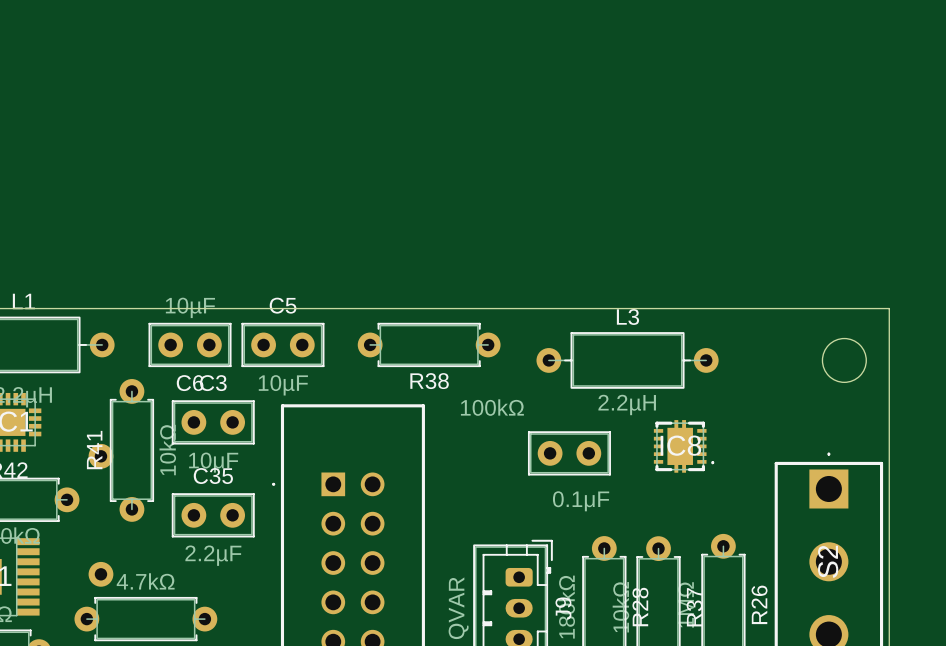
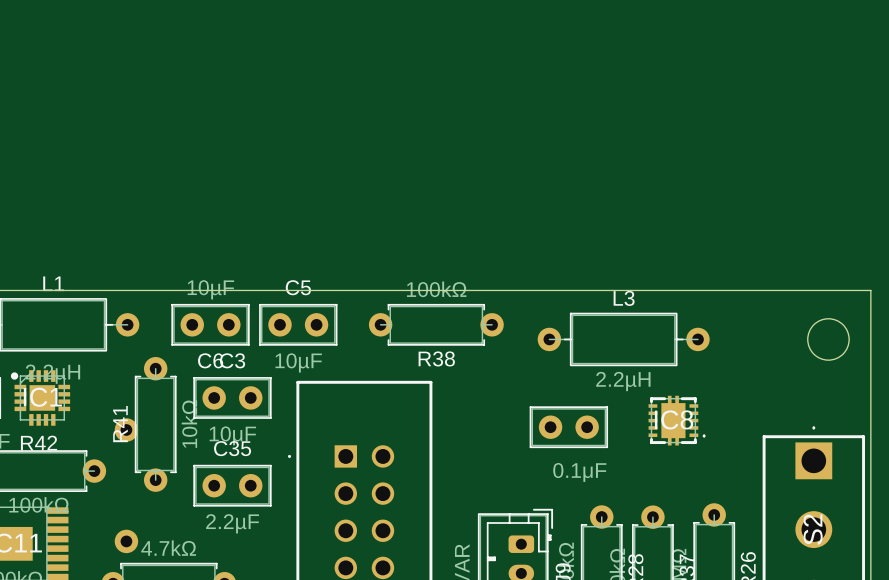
R38 value position: 100kΩ (492, 407) -> 100kΩ (436, 289)

